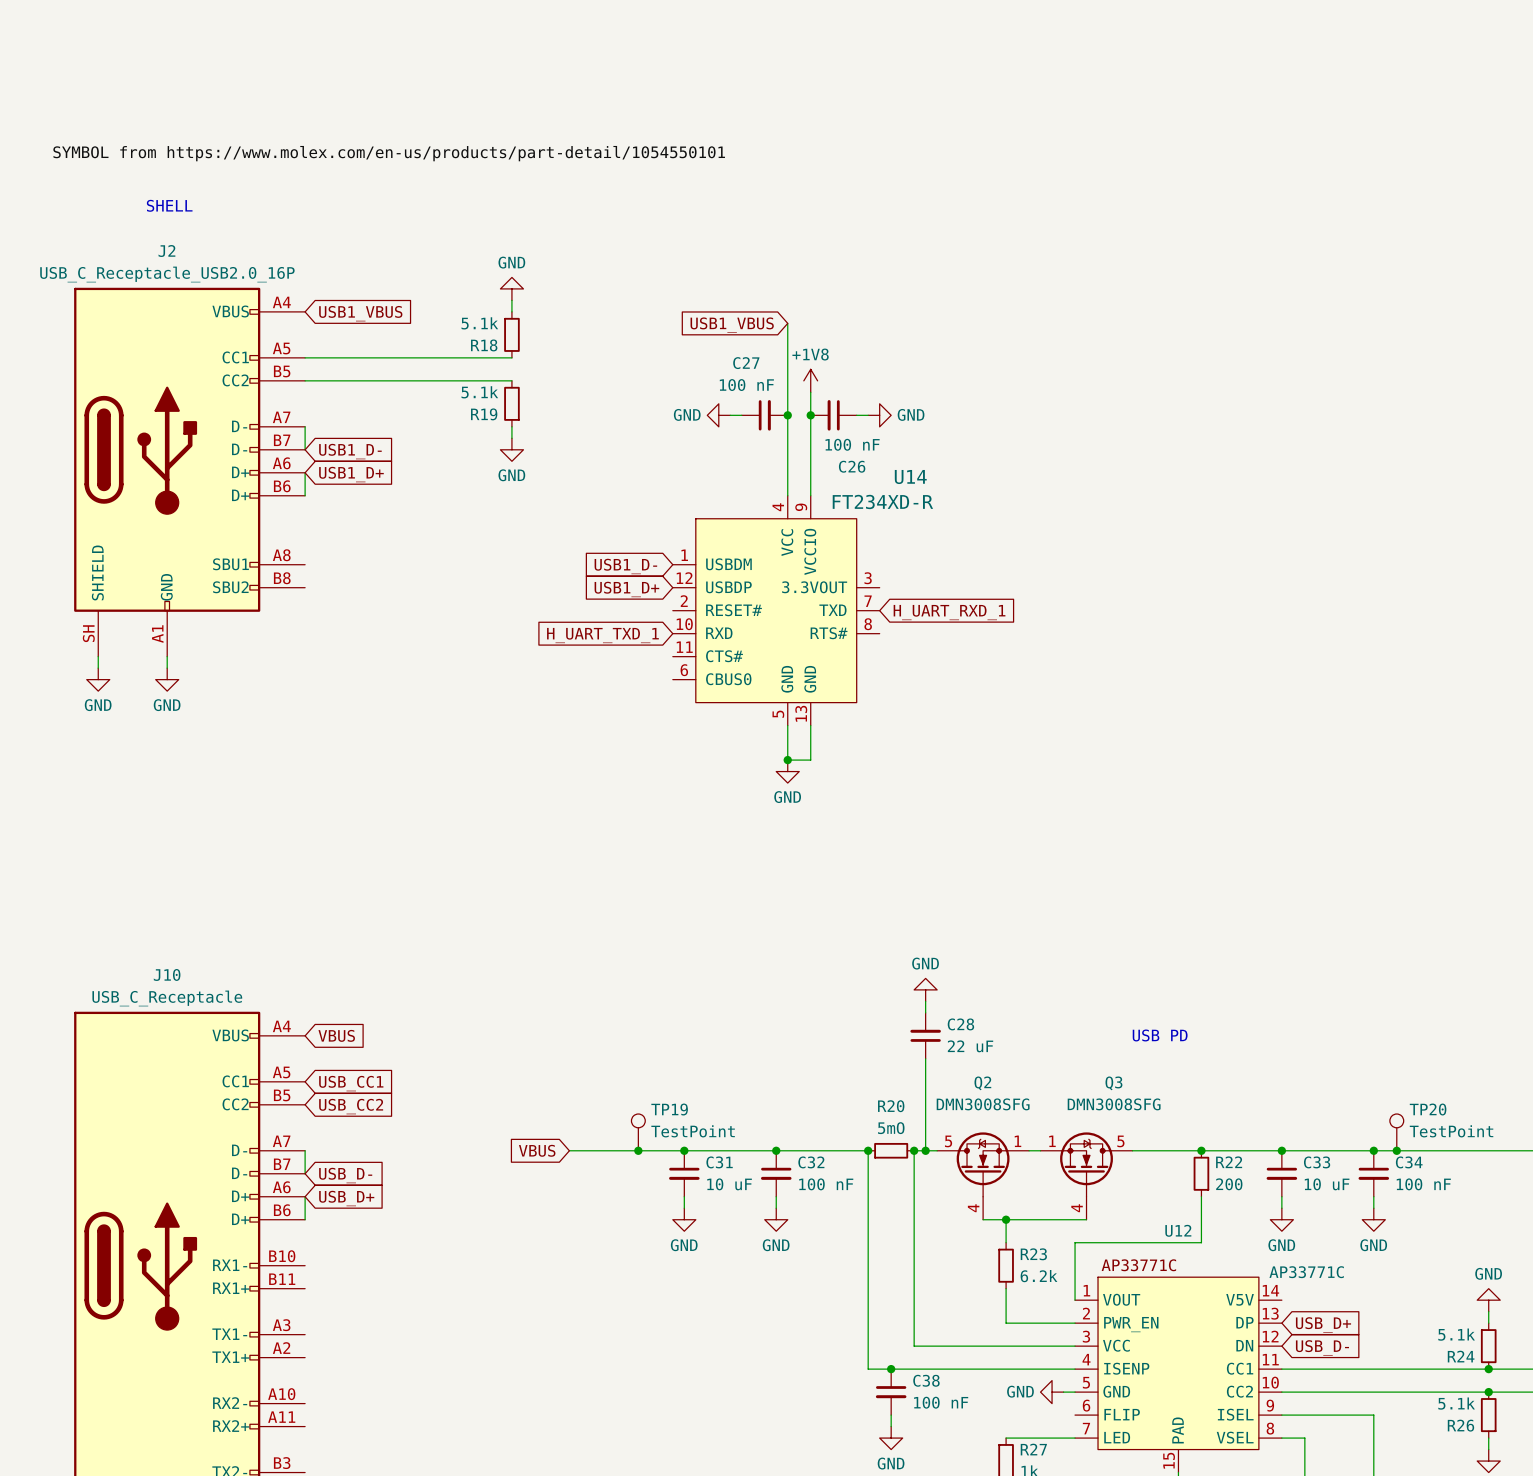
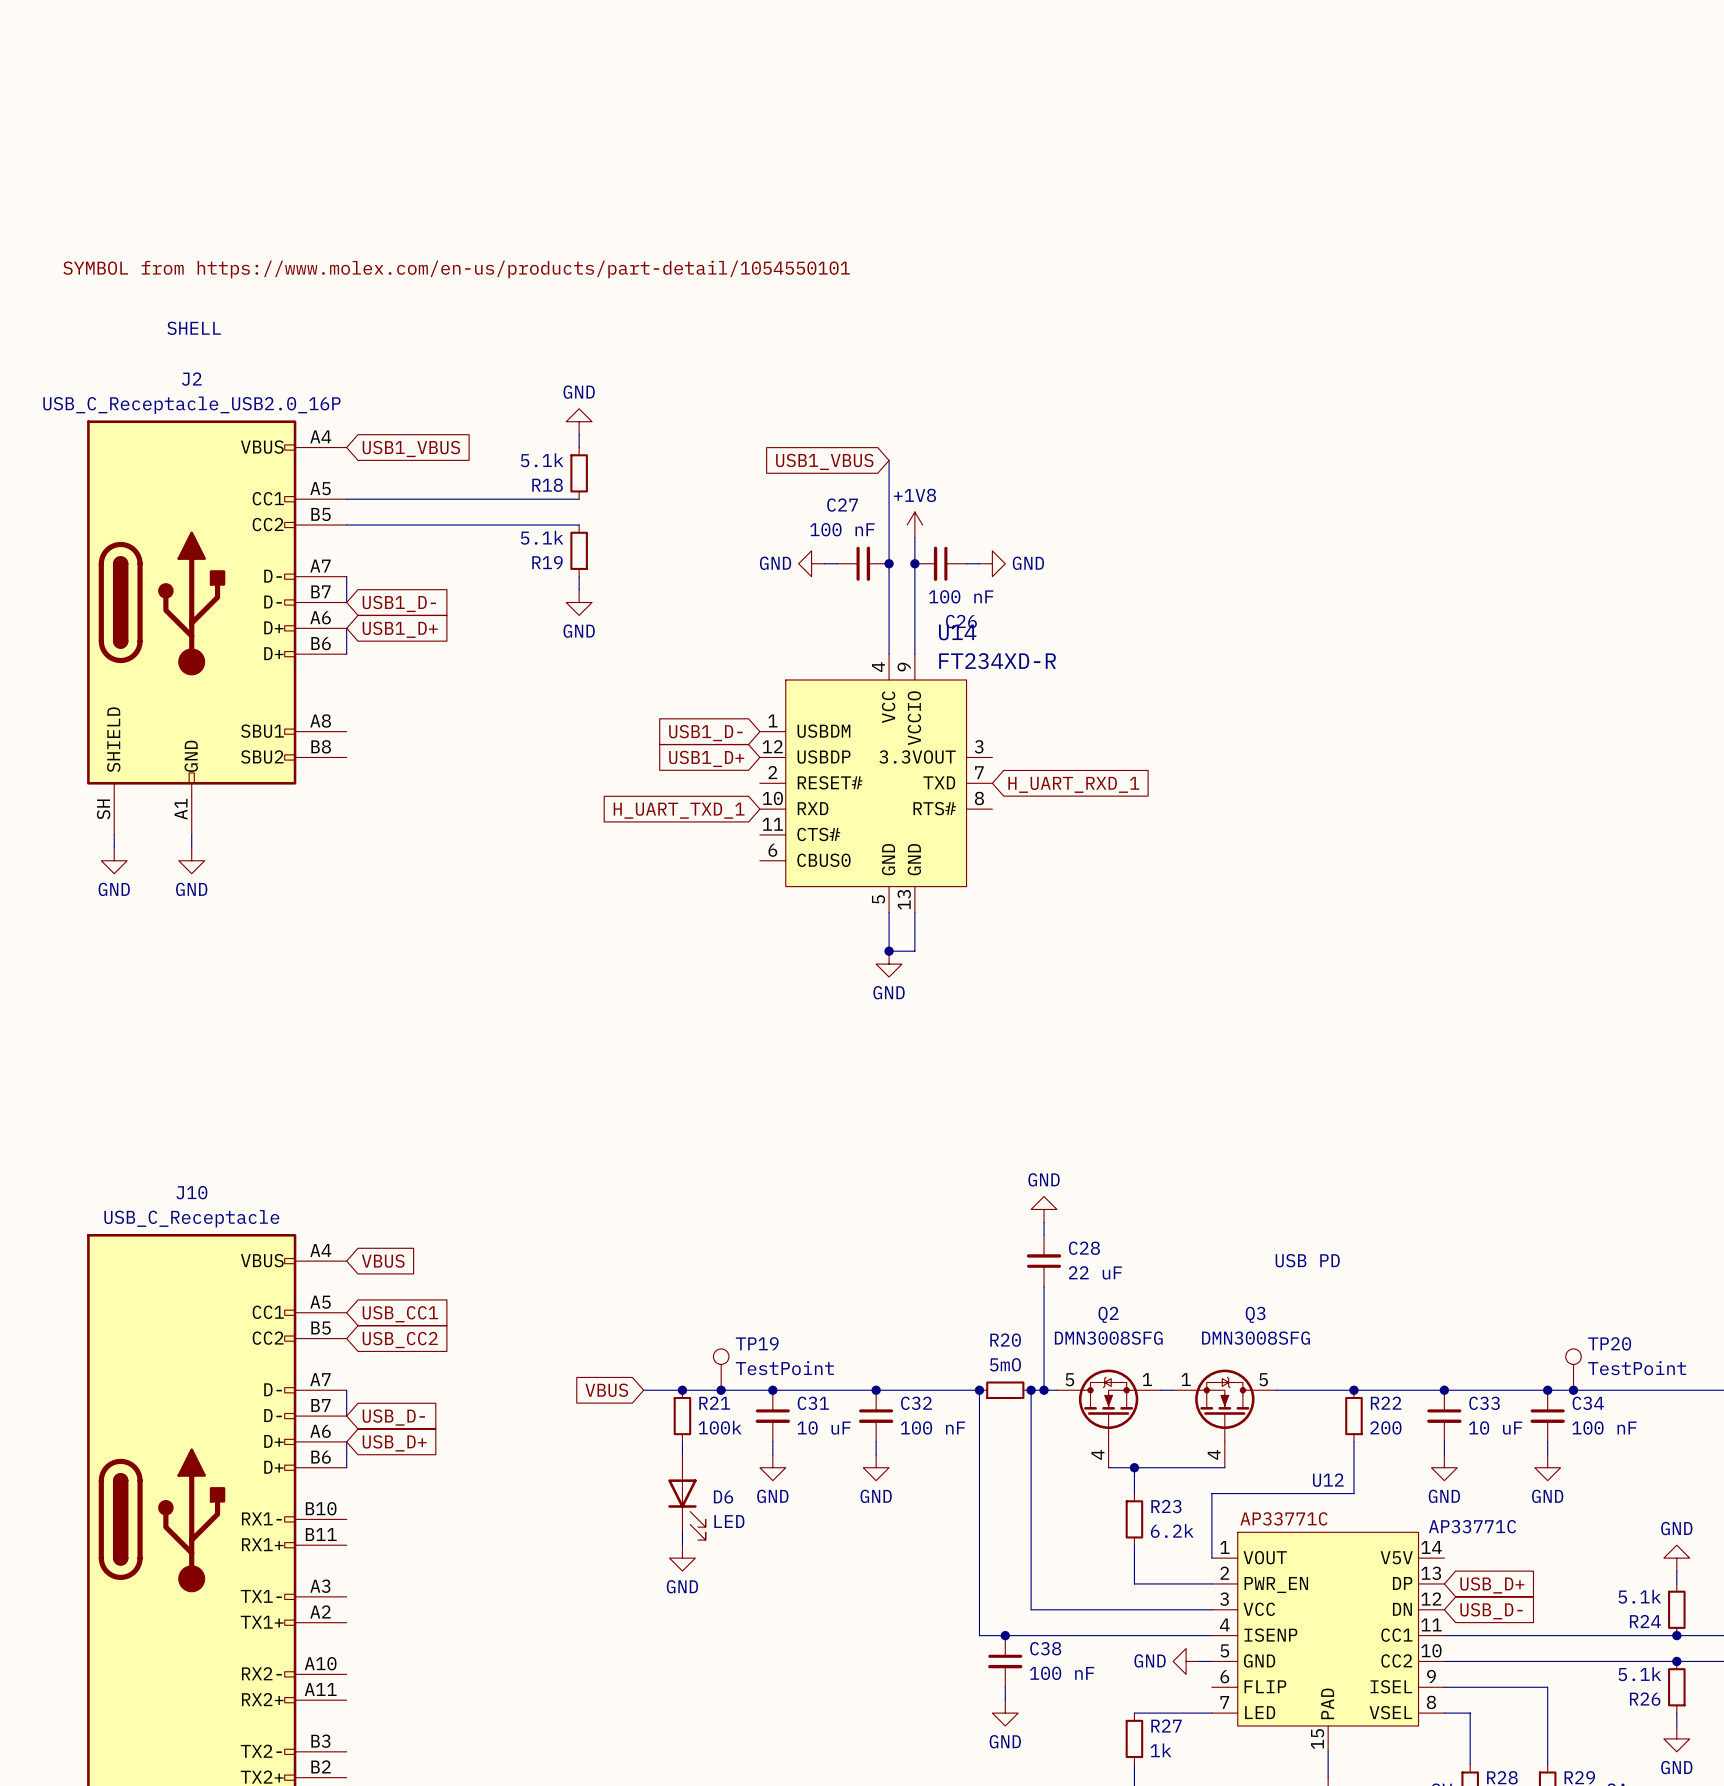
U14 name position: U14 (910, 477) -> U14 (957, 632)
junction: none -> (682, 1390)
R21: none -> 100k (682, 1416)
wire: none -> (682, 1441) (682, 1454)
D6: none -> LED (686, 1497)
wire: none -> (682, 1532) (682, 1545)
power symbol: none -> GND (682, 1558)

